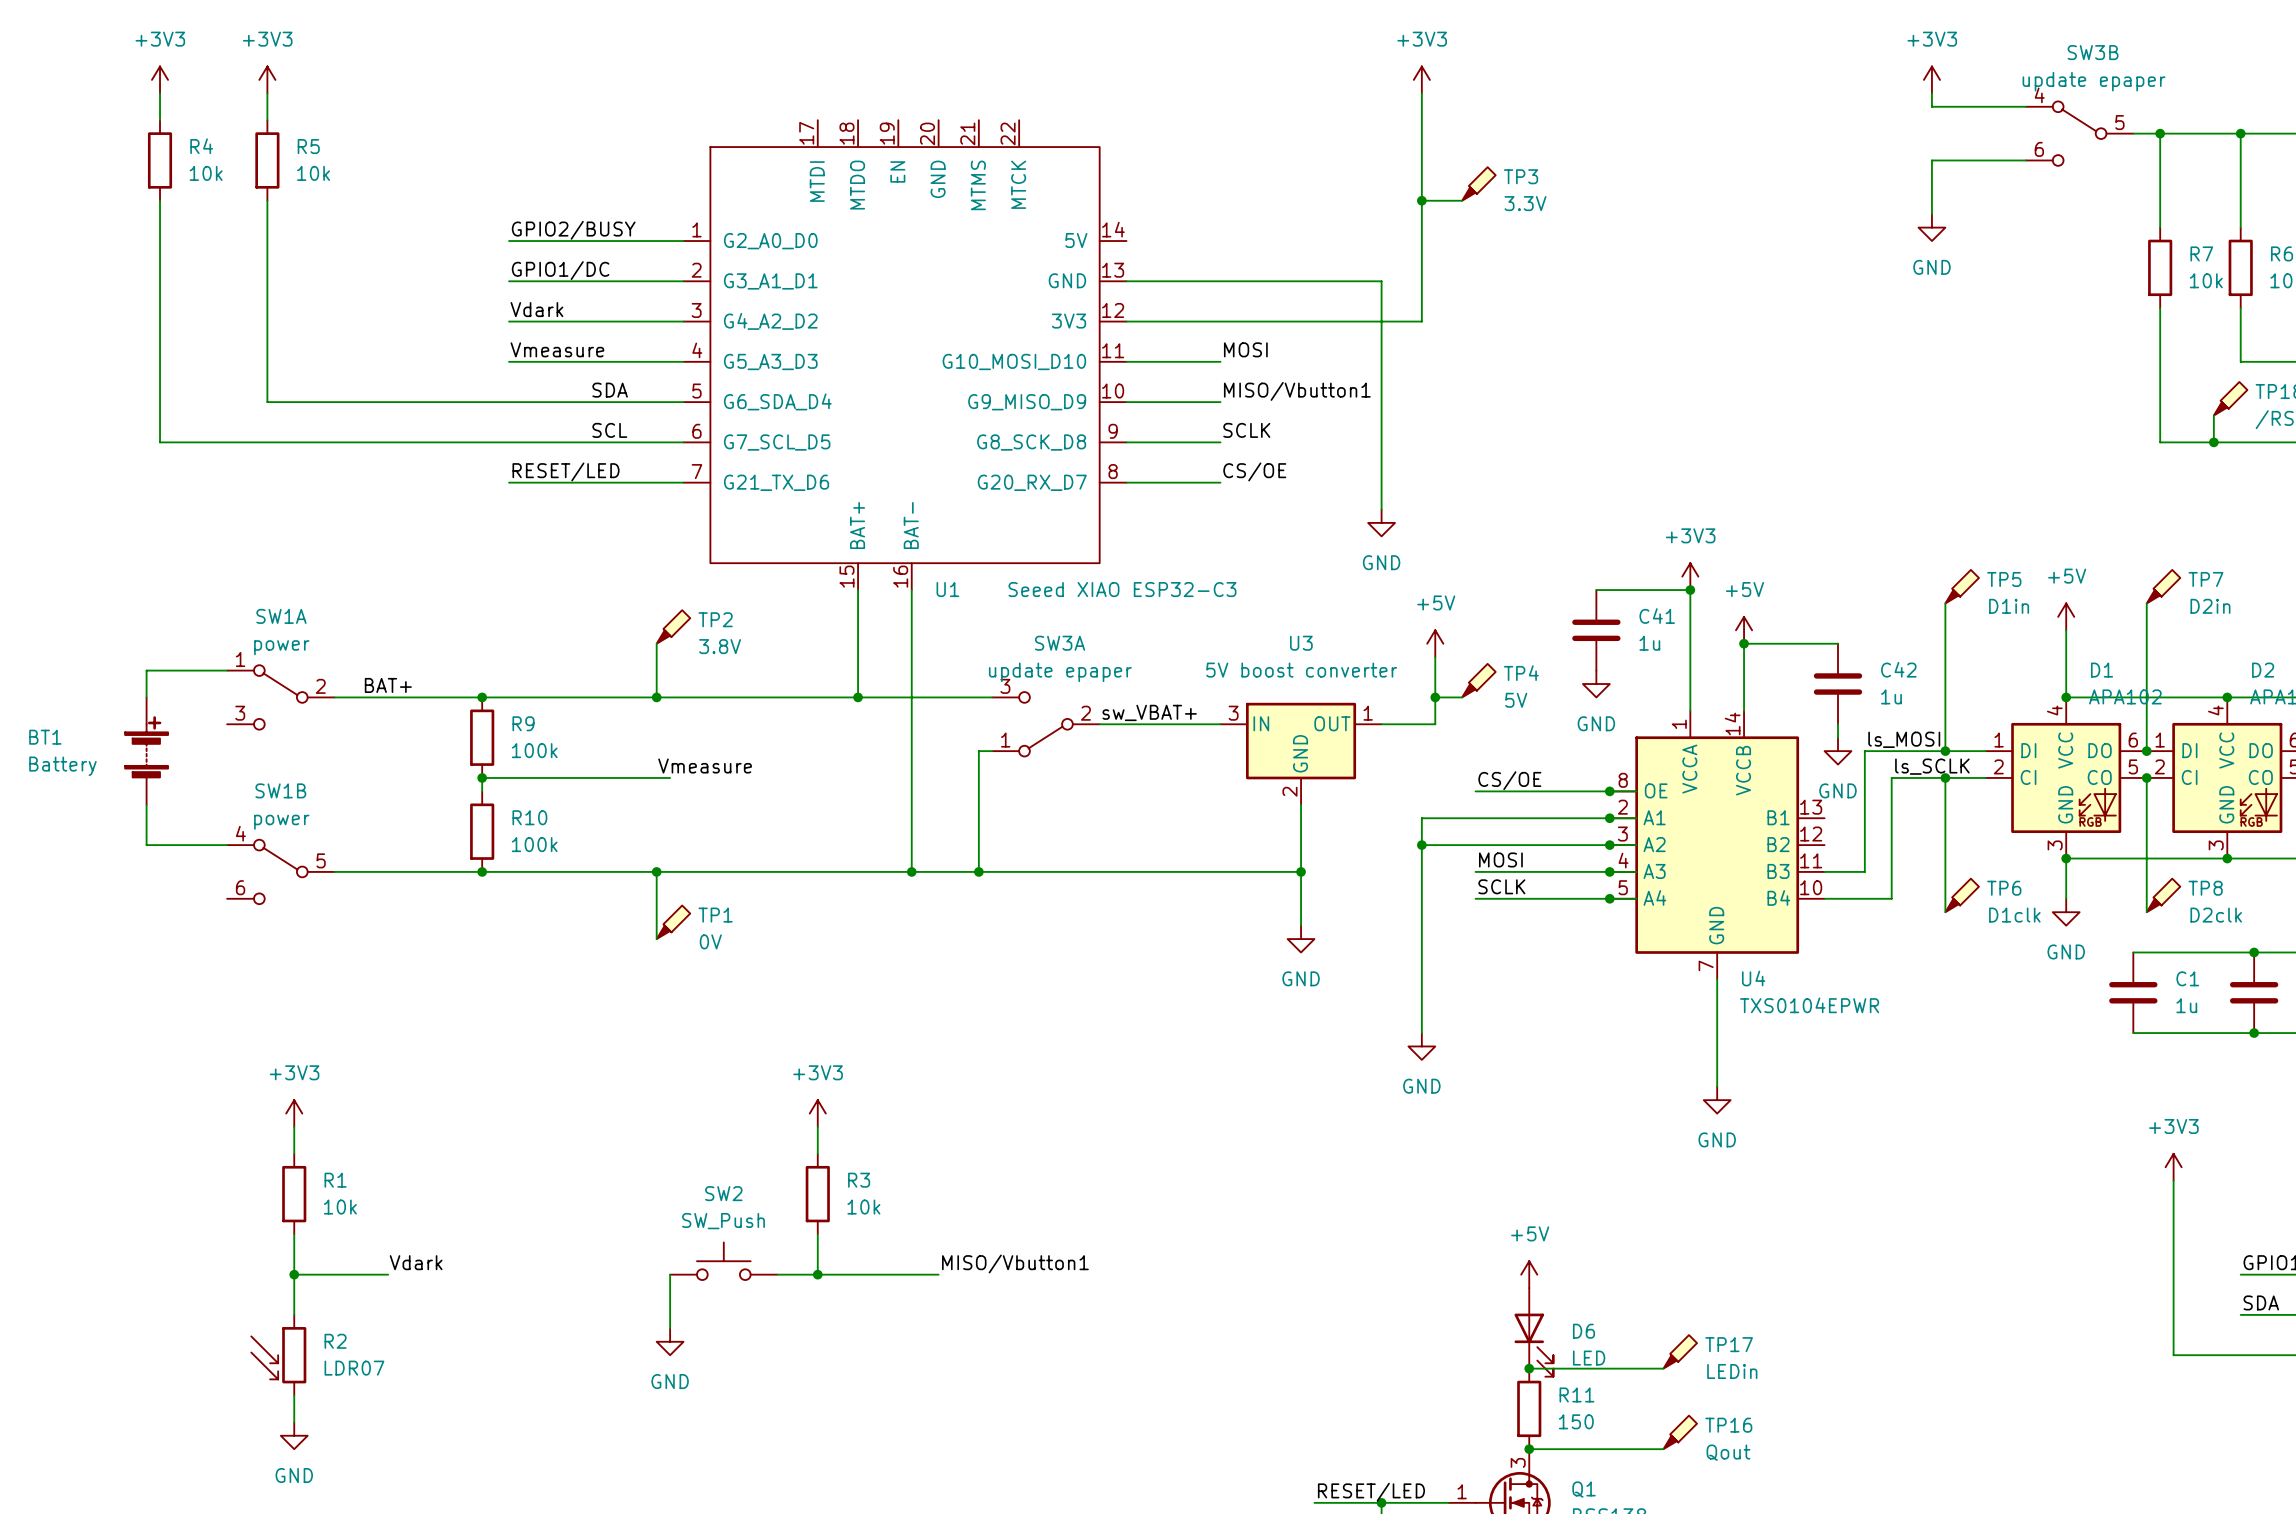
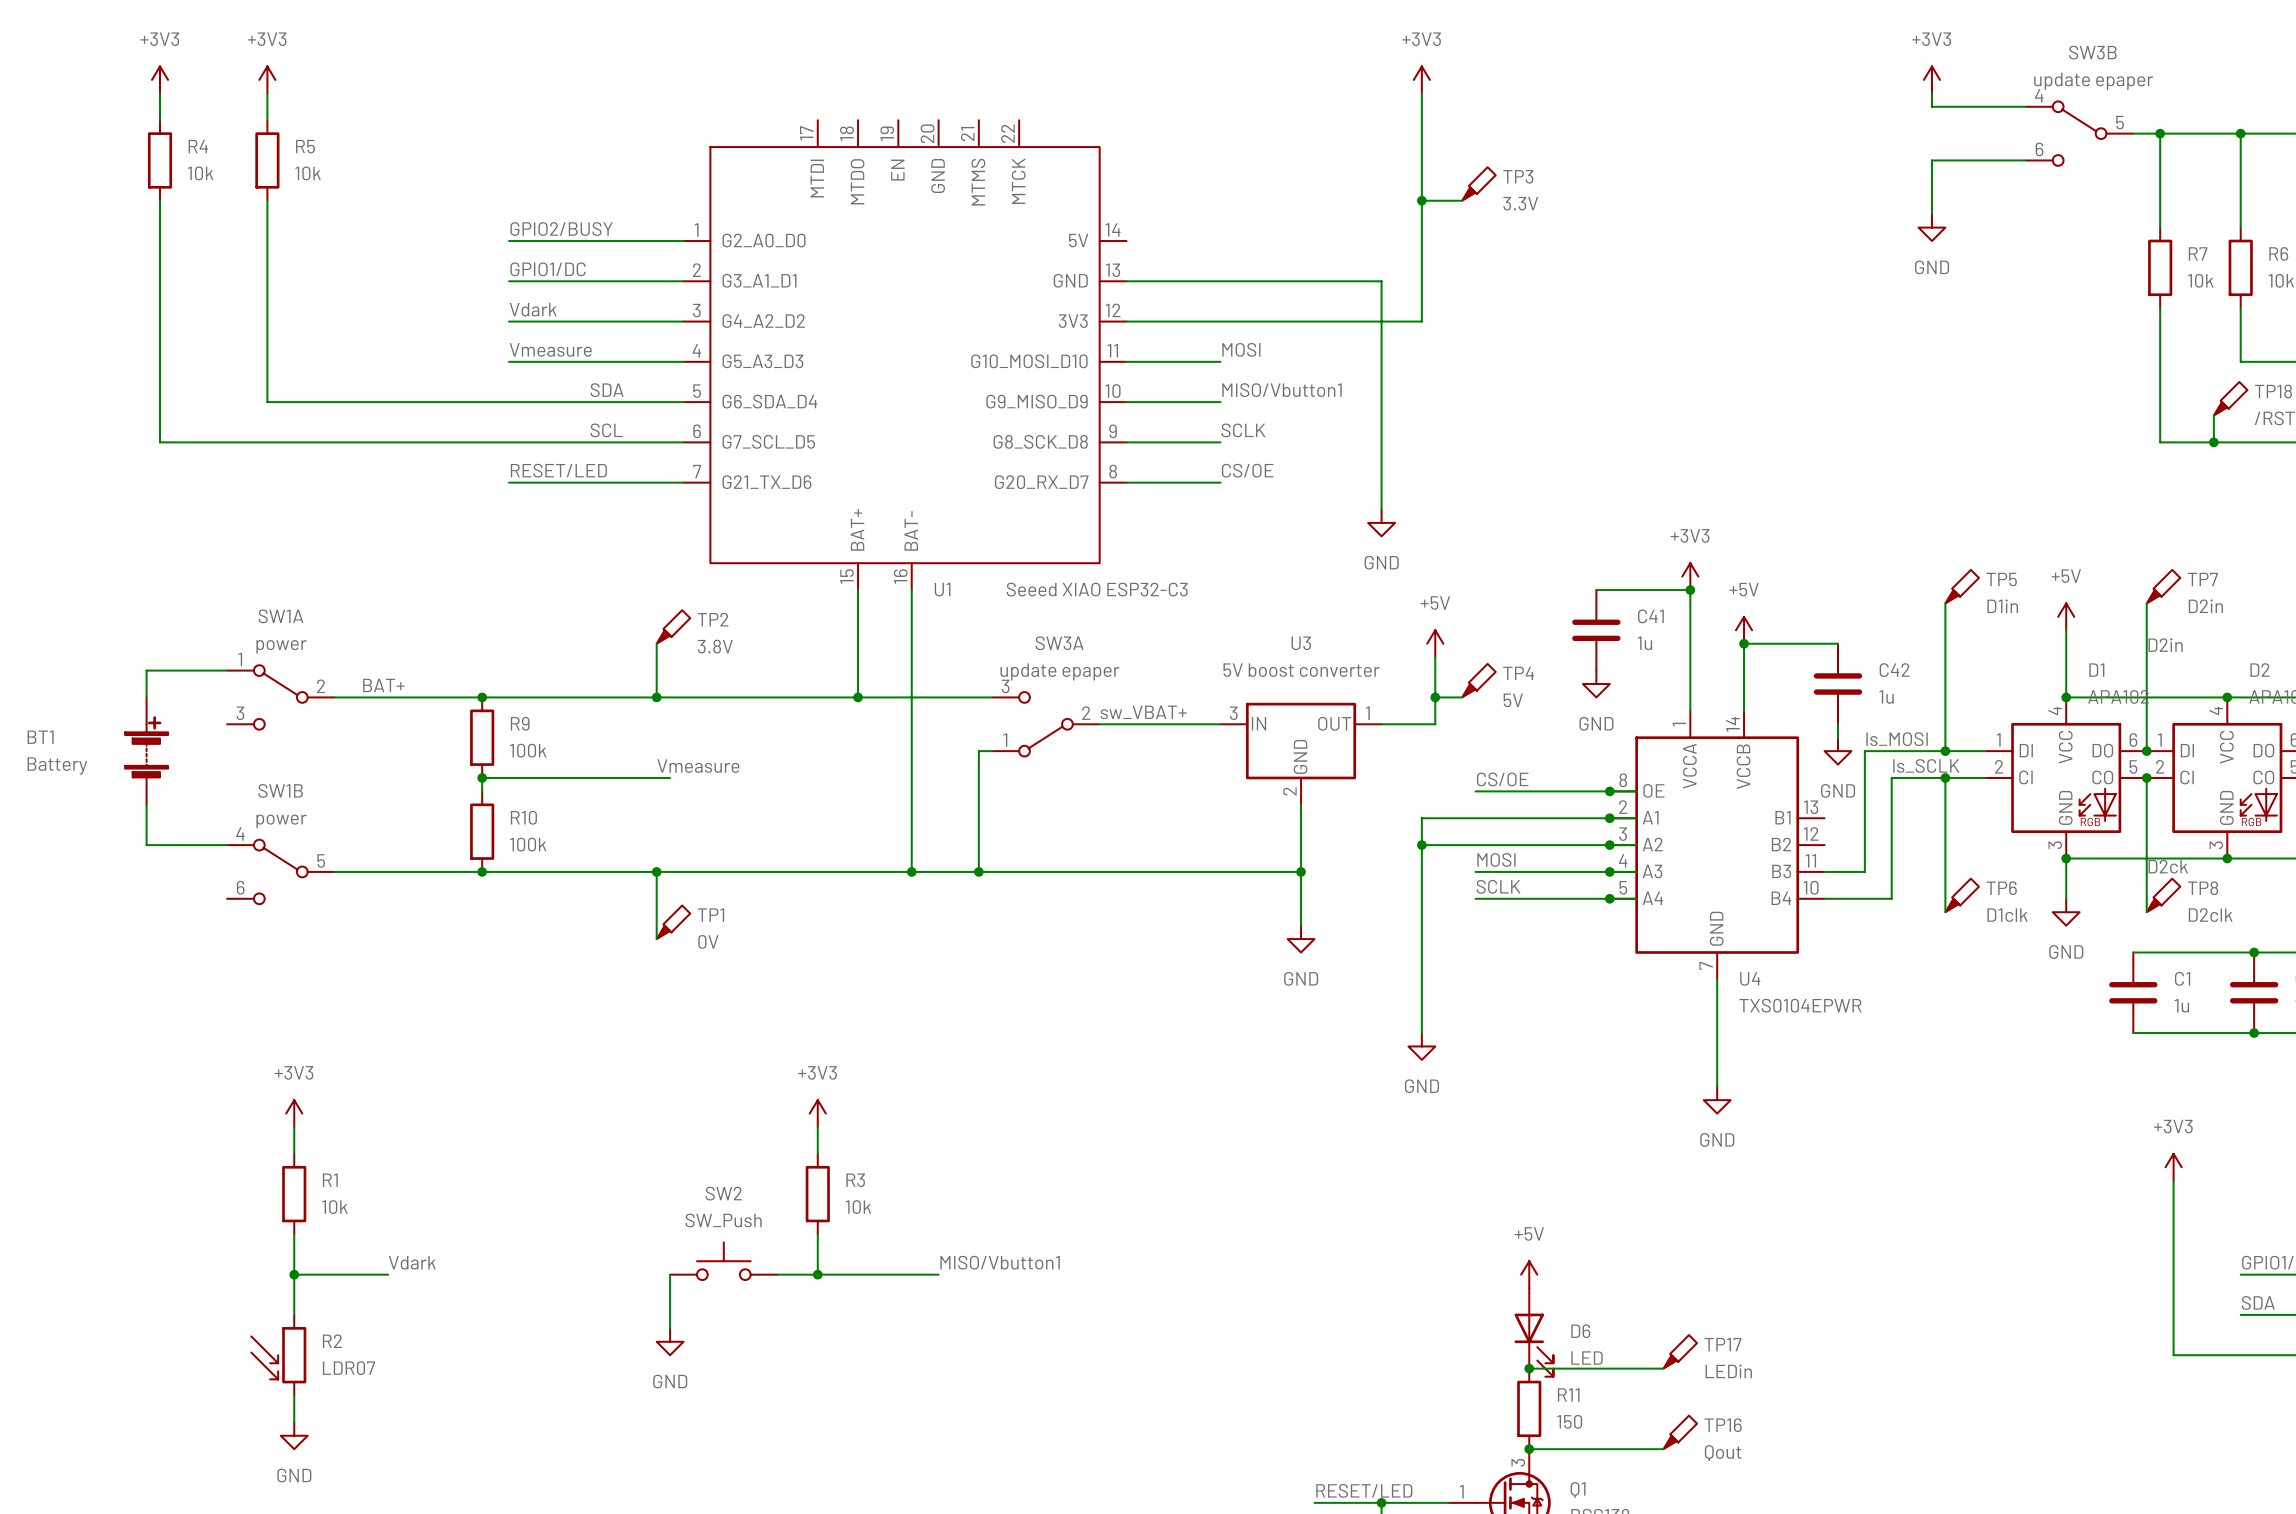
label: none -> D2in (2165, 645)
label: none -> D2ck (2168, 866)

